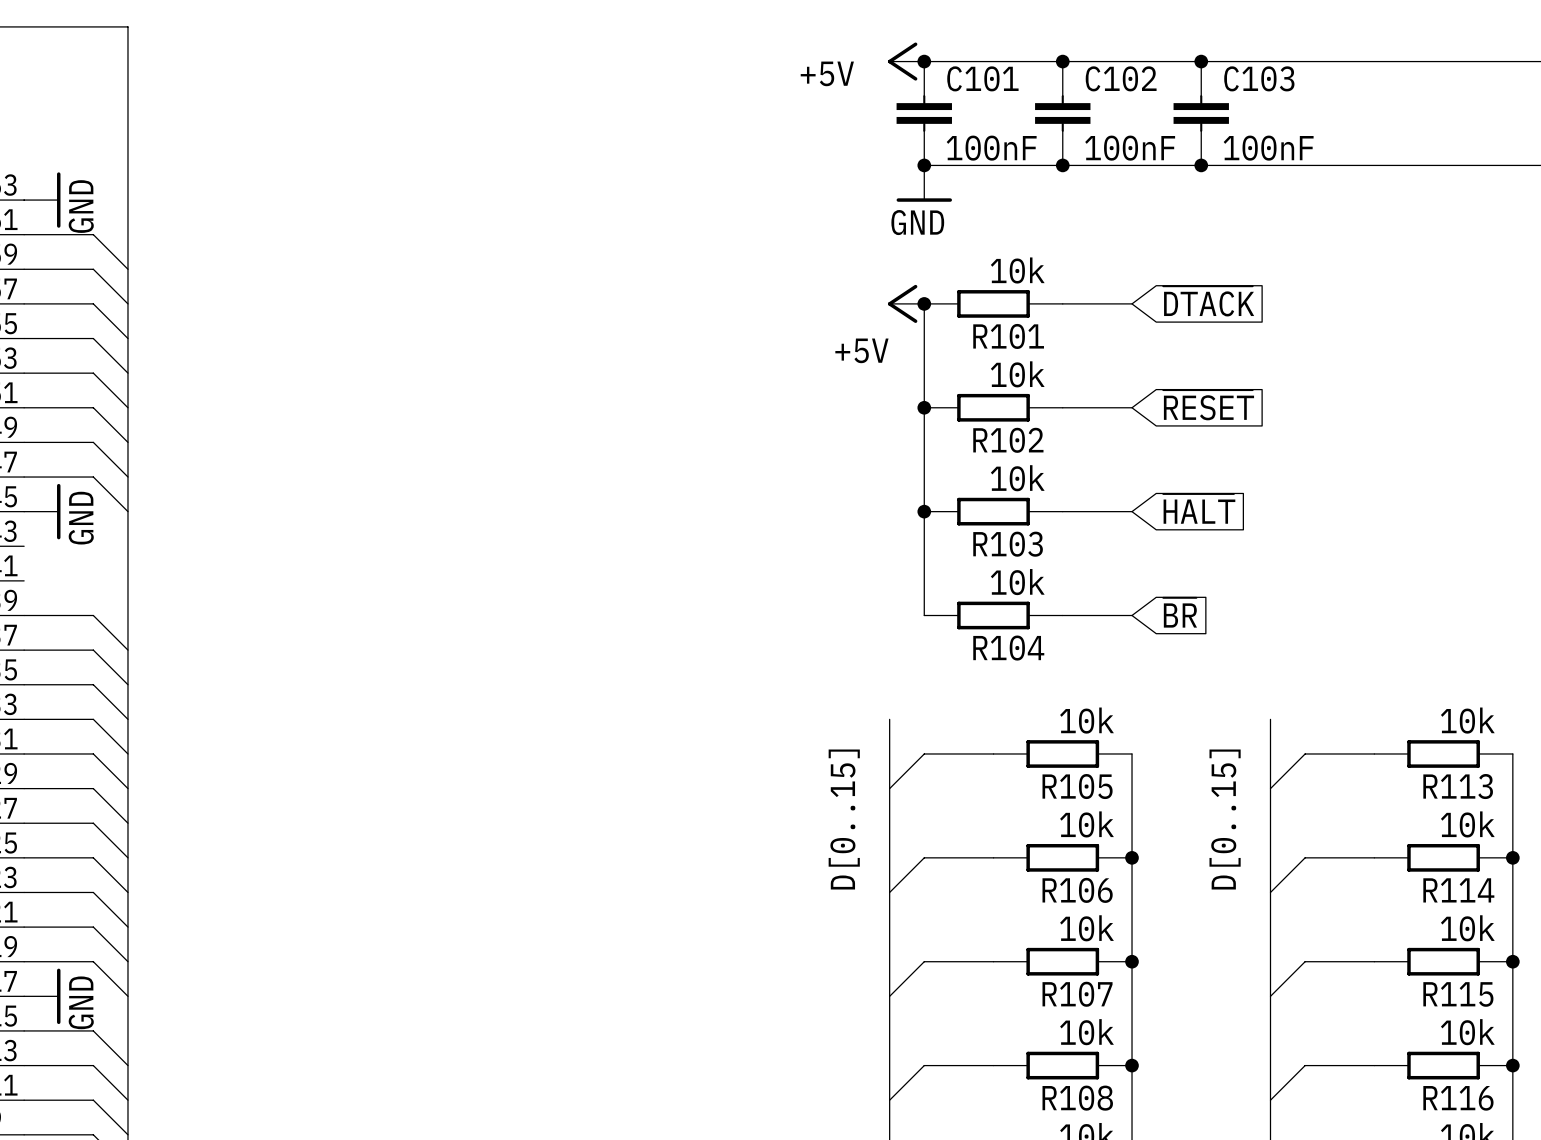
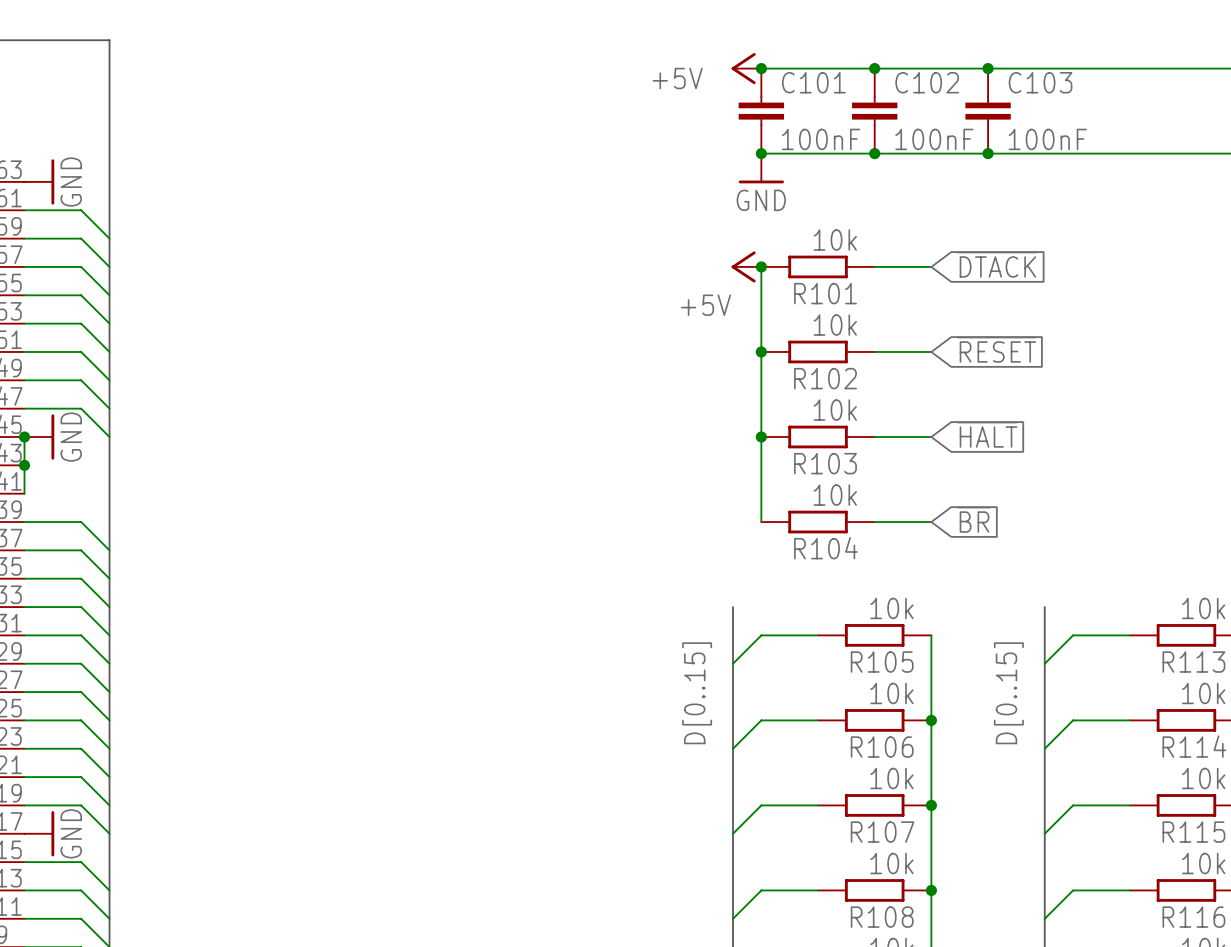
wire: none -> (24, 437) (24, 493)
junction: none -> (24, 437)
junction: none -> (24, 465)

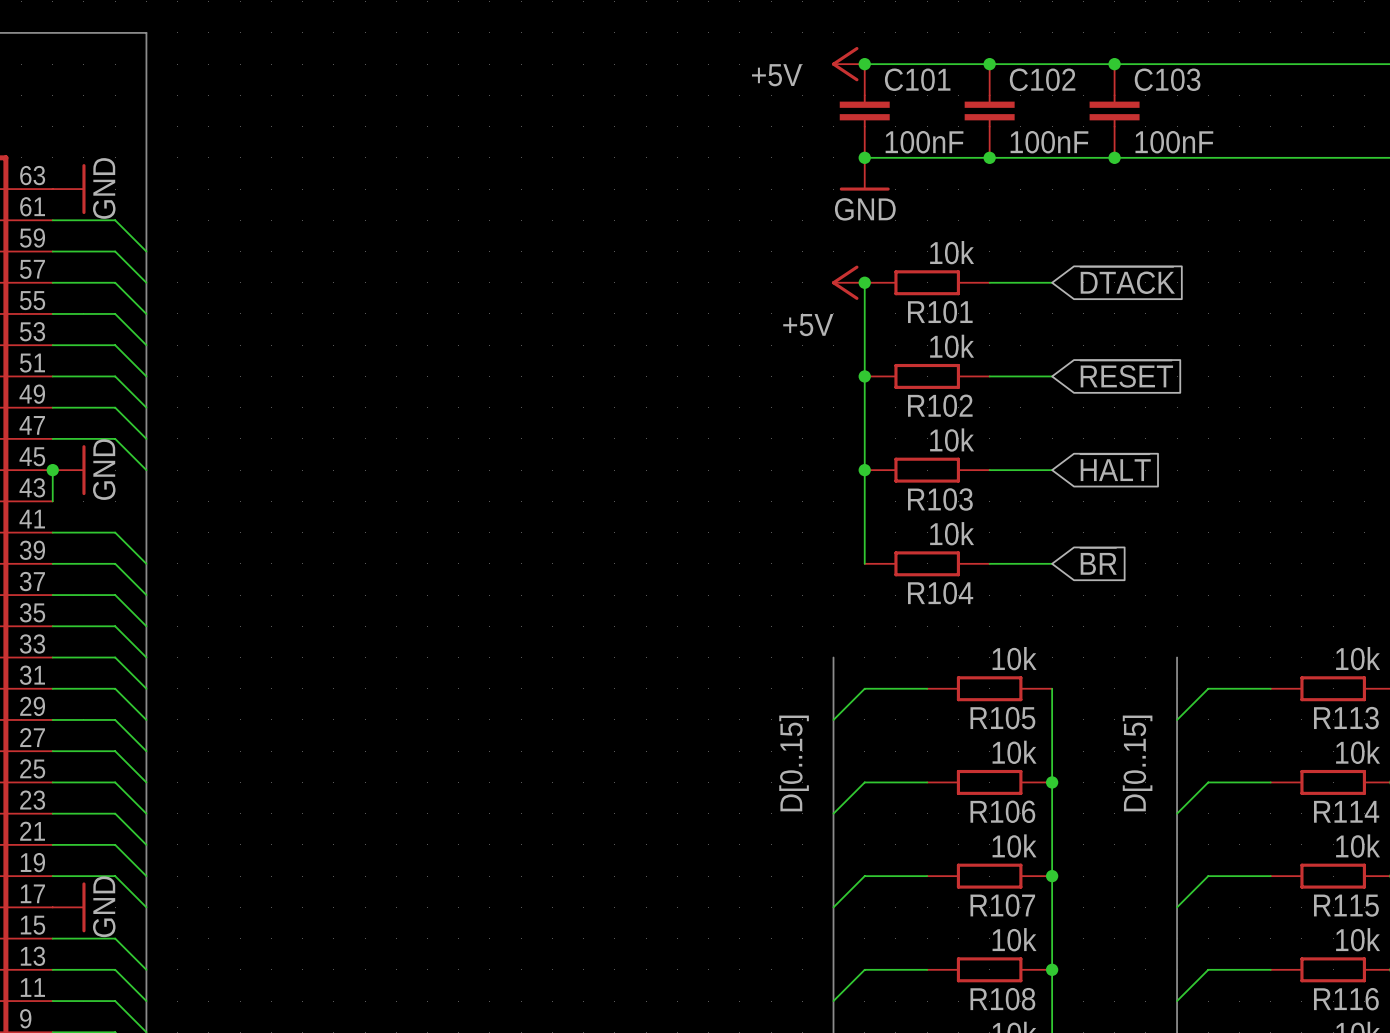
wire: (24, 465) (24, 493) -> (146, 563) (115, 532) (52, 532)
junction: (24, 465) -> none

